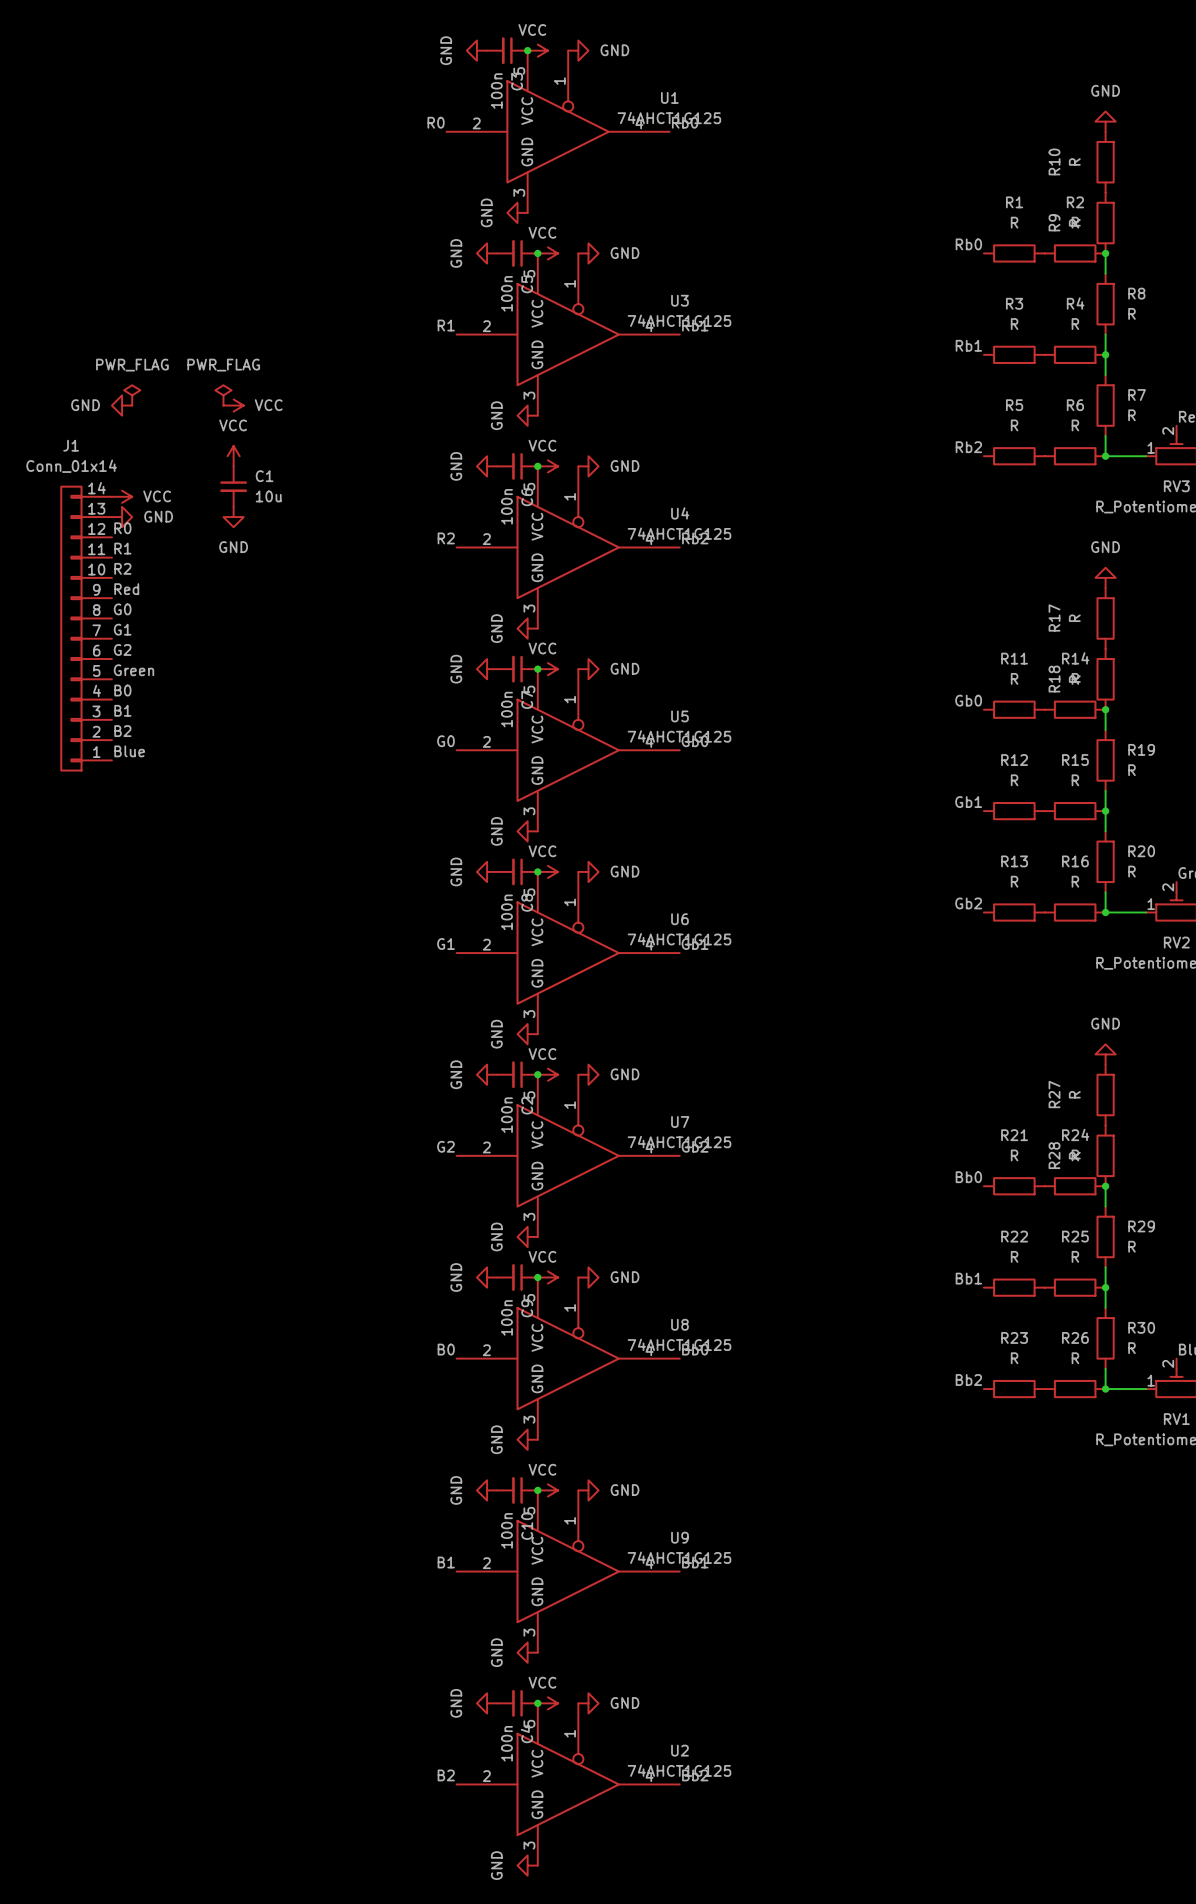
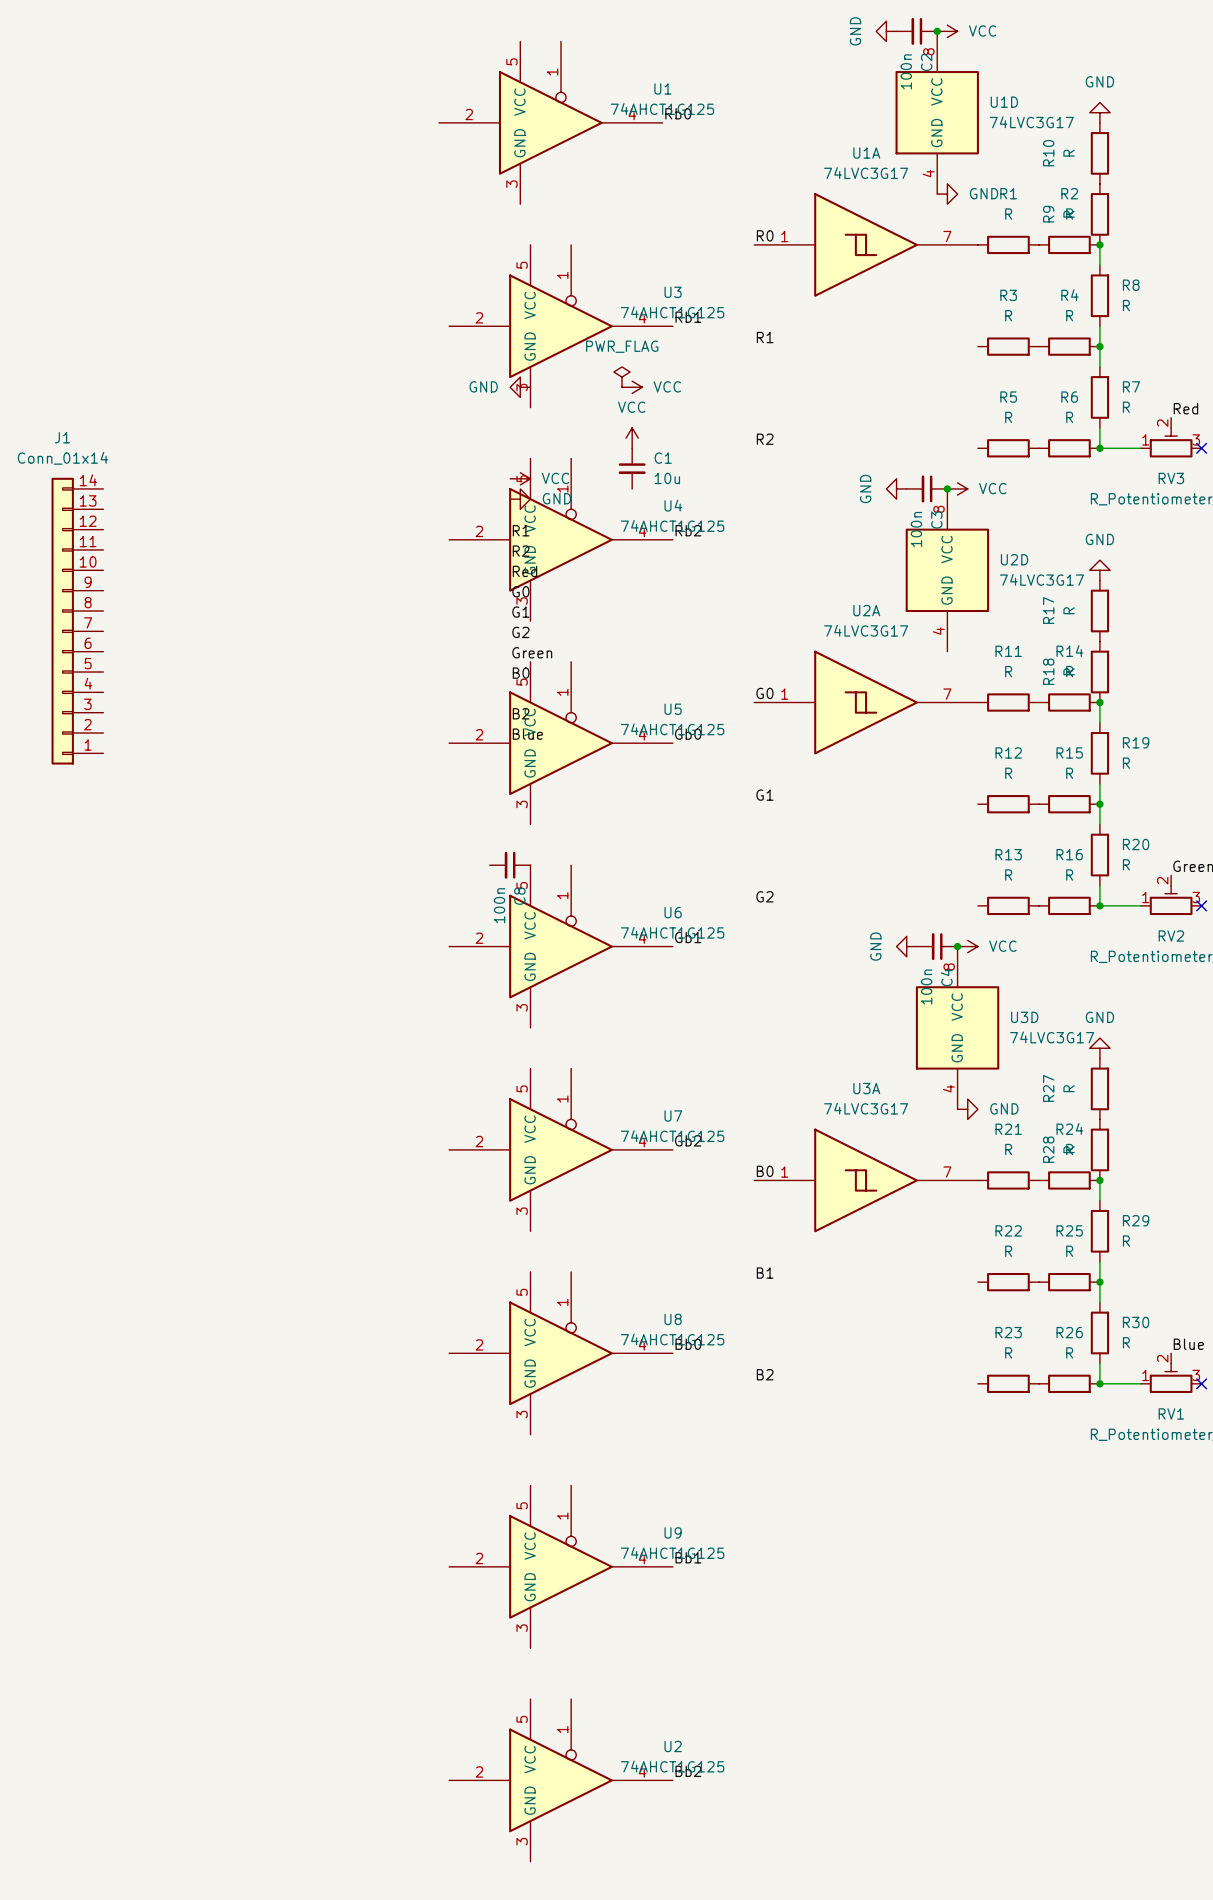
power symbol: none -> GND (886, 31)
junction: none -> (937, 31)
power symbol: none -> VCC (947, 31)
power symbol: GND (476, 50) -> none
C3 position: (507, 50) -> (927, 488)
junction: (527, 50) -> none
power symbol: VCC (537, 50) -> none
power symbol: GND (578, 50) -> none
U1D: none -> 74LVC3G17 (937, 112)
label: R0 (436, 122) -> none
power symbol: none -> GND (947, 194)
power symbol: GND (517, 212) -> none
label: none -> R0 (765, 235)
label: Rb0 (968, 244) -> none
power symbol: GND (487, 253) -> none
C5: 100n (517, 253) -> none
junction: (537, 253) -> none
power symbol: VCC (547, 253) -> none
power symbol: GND (588, 253) -> none
U1A: none -> 74LVC3G17 (866, 244)
label: R1 (446, 325) -> none
label: none -> R1 (765, 337)
label: Rb1 (968, 345) -> none
power symbol: none -> PWR_FLAG (622, 377)
power symbol: PWR_FLAG (132, 395) -> none
power symbol: PWR_FLAG (223, 395) -> none
power symbol: none -> VCC (632, 387)
power symbol: GND (122, 405) -> none
power symbol: VCC (233, 405) -> none
power symbol text rotation: 0° (496, 415) -> 90° clockwise (483, 386)
power symbol position: GND (527, 415) -> GND (520, 387)
power symbol text position: VCC (542, 445) -> VCC (555, 478)
power symbol: none -> VCC (632, 438)
label: none -> R2 (765, 439)
label: Rb2 (968, 447) -> none
power symbol: VCC (233, 456) -> none
power symbol: GND (487, 466) -> none
C6: 100n (517, 466) -> none
junction: (537, 466) -> none
power symbol position: VCC (547, 466) -> VCC (520, 478)
power symbol: GND (588, 466) -> none
C1 position: (233, 486) -> (632, 468)
power symbol: VCC (122, 496) -> none
power symbol: none -> GND (896, 488)
junction: none -> (947, 488)
power symbol: none -> VCC (957, 488)
power symbol: none -> GND (520, 499)
power symbol: GND (122, 517) -> none
power symbol: GND (233, 517) -> none
label: R0 (122, 528) -> none
label position: R2 (446, 538) -> R2 (521, 551)
label: none -> R1 (521, 530)
label: R1 (122, 548) -> none
label: R2 (122, 568) -> none
U2D: none -> 74LVC3G17 (947, 570)
label: none -> Red (524, 571)
label: Red (126, 589) -> none
label: none -> G0 (520, 591)
label: G0 (122, 609) -> none
label: none -> G1 (520, 612)
power symbol: GND (527, 628) -> none
label: G1 (122, 629) -> none
label: none -> G2 (520, 632)
label: G2 (122, 649) -> none
label: none -> Green (532, 652)
power symbol: GND (487, 669) -> none
C7: 100n (517, 669) -> none
junction: (537, 669) -> none
power symbol: VCC (547, 669) -> none
power symbol: GND (588, 669) -> none
label: Green (133, 670) -> none
label: none -> B0 (521, 673)
label: B0 (122, 690) -> none
label: none -> G0 (764, 693)
label: Gb0 (968, 700) -> none
U2A: none -> 74LVC3G17 (866, 702)
label: B1 (122, 710) -> none
label: none -> B2 (521, 713)
label: B2 (122, 731) -> none
label: G0 (445, 741) -> none
label: none -> Blue (527, 734)
label: Blue (129, 751) -> none
label: none -> G1 (764, 795)
label: Gb1 (968, 802) -> none
power symbol: GND (527, 831) -> none
power symbol: GND (487, 871) -> none
junction: (537, 871) -> none
power symbol: VCC (547, 871) -> none
power symbol: GND (588, 871) -> none
label: none -> G2 (764, 896)
label: Gb2 (968, 903) -> none
label: G1 (445, 944) -> none
power symbol: none -> GND (906, 946)
junction: none -> (957, 946)
power symbol: none -> VCC (967, 946)
power symbol: GND (527, 1034) -> none
U3D: none -> 74LVC3G17 (957, 1027)
power symbol: GND (487, 1074) -> none
C2 position: (517, 1074) -> (916, 31)
junction: (537, 1074) -> none
power symbol: VCC (547, 1074) -> none
power symbol: GND (588, 1074) -> none
power symbol: none -> GND (967, 1109)
label: G2 (445, 1146) -> none
label: none -> B0 (765, 1171)
label: Bb0 (968, 1177) -> none
U3A: none -> 74LVC3G17 (866, 1180)
power symbol: GND (527, 1236) -> none
power symbol: GND (487, 1277) -> none
C9: 100n (517, 1277) -> none
junction: (537, 1277) -> none
power symbol: VCC (547, 1277) -> none
power symbol: GND (588, 1277) -> none
label: none -> B1 (765, 1273)
label: Bb1 (968, 1278) -> none
label: B0 (446, 1349) -> none
label: none -> B2 (765, 1374)
label: Bb2 (968, 1379) -> none
power symbol: GND (527, 1439) -> none
power symbol: GND (487, 1490) -> none
C10: 100n (517, 1490) -> none
junction: (537, 1490) -> none
power symbol: VCC (547, 1490) -> none
power symbol: GND (588, 1490) -> none
label: B1 (446, 1562) -> none
power symbol: GND (527, 1652) -> none
power symbol: GND (487, 1703) -> none
C4 position: (517, 1703) -> (937, 946)
junction: (537, 1703) -> none
power symbol: VCC (547, 1703) -> none
power symbol: GND (588, 1703) -> none
label: B2 (446, 1775) -> none
power symbol: GND (527, 1865) -> none

